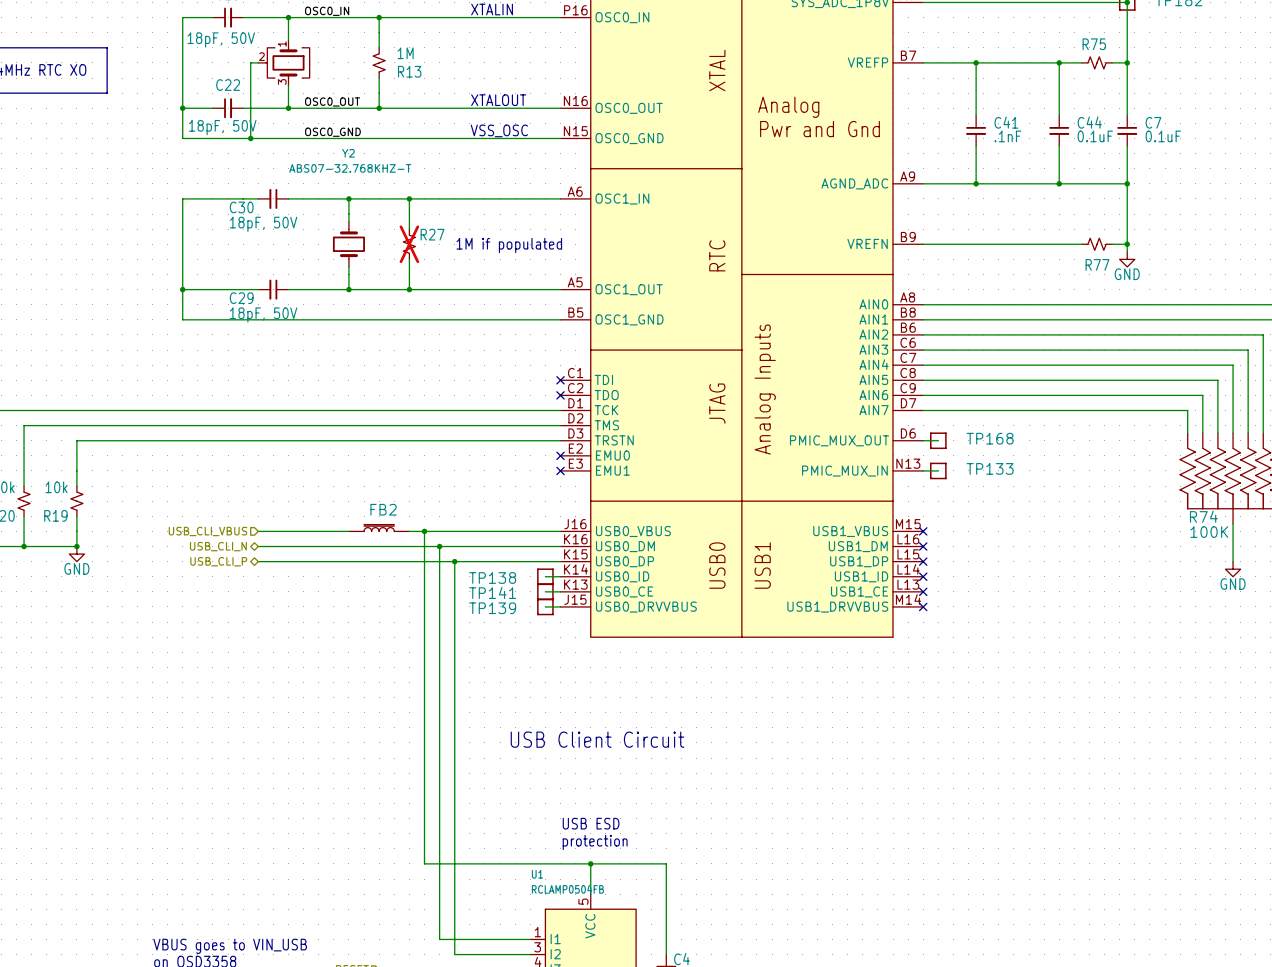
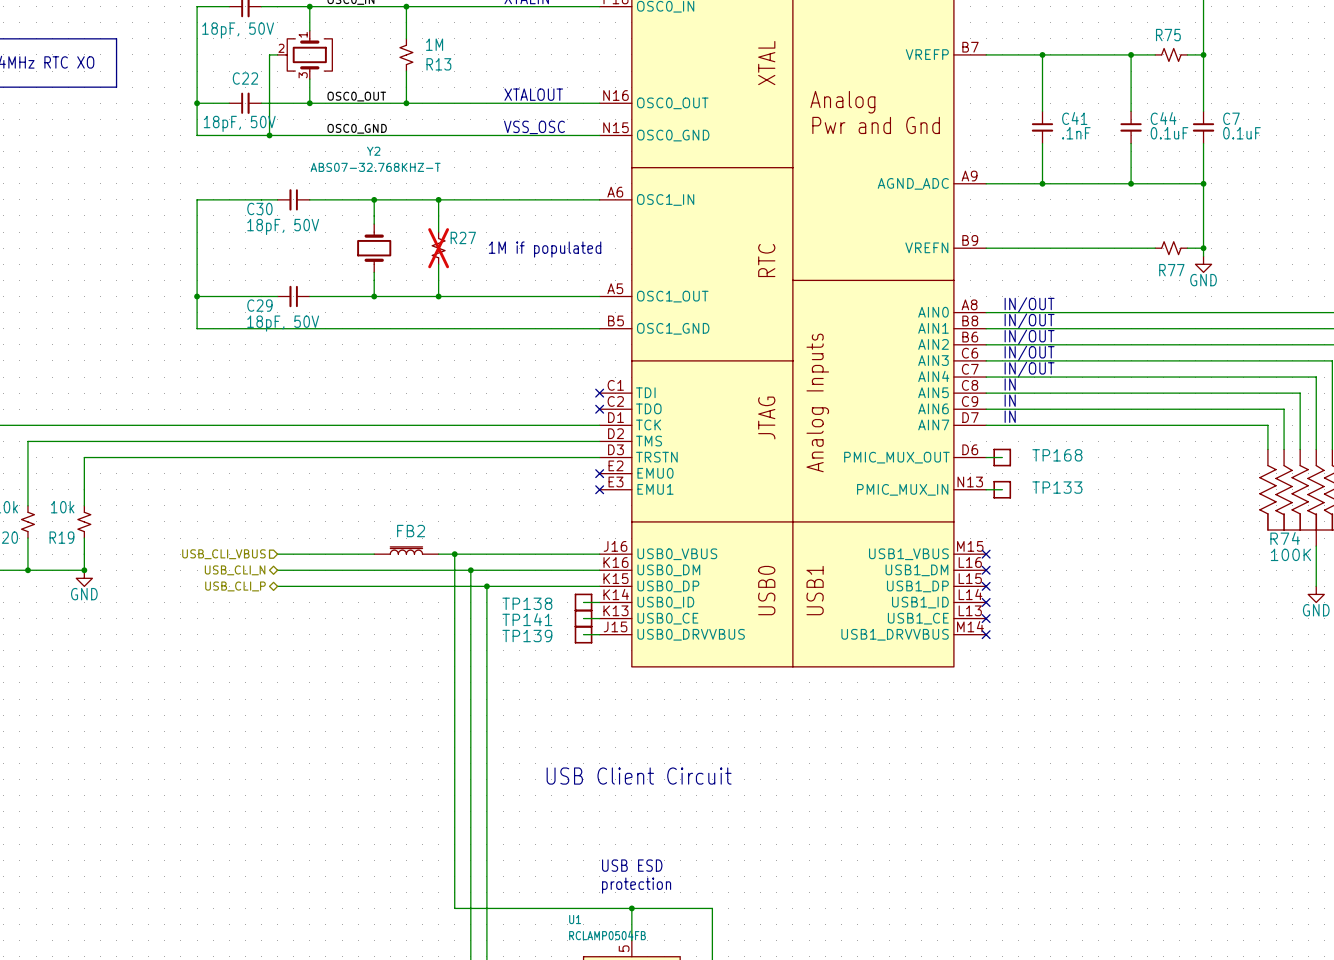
text: none -> IN/OUT (1029, 305)
text: none -> IN/OUT (1029, 321)
text: none -> IN/OUT (1029, 337)
text: none -> IN/OUT (1029, 353)
text: none -> IN/OUT (1029, 369)
text: none -> IN (1010, 384)
text: none -> IN (1010, 400)
text: none -> IN (1010, 416)

